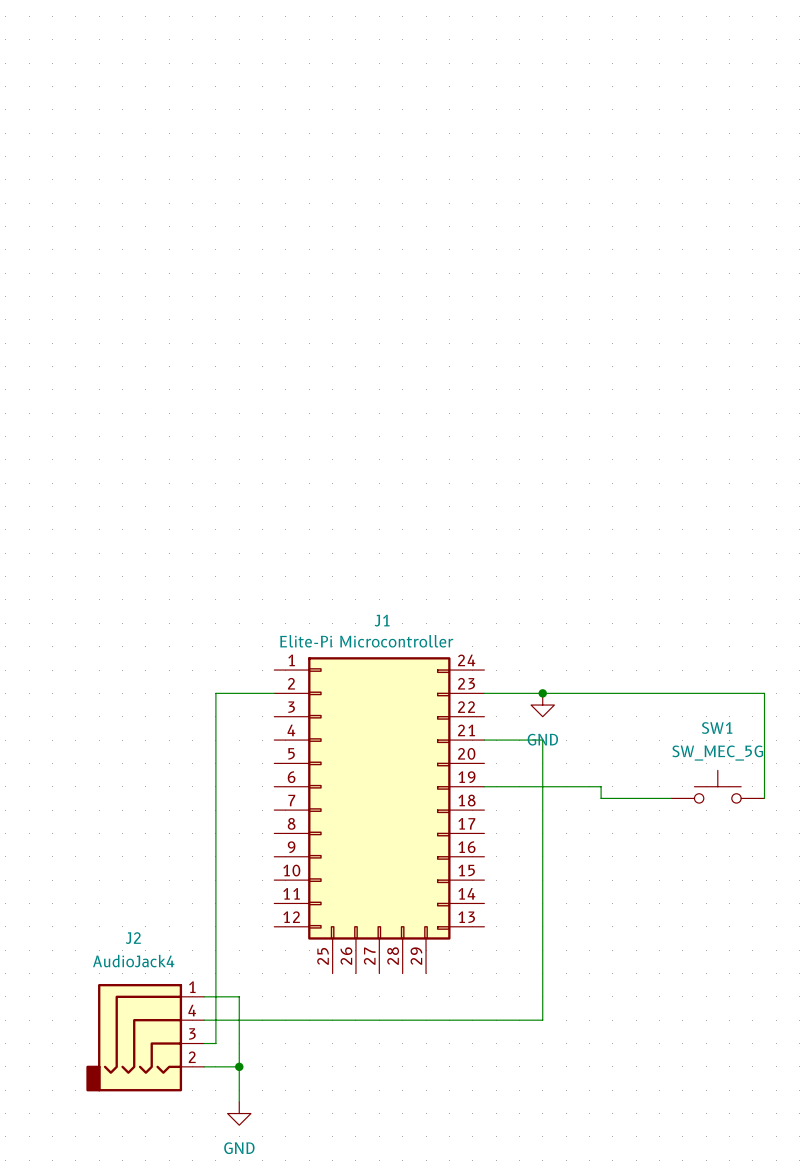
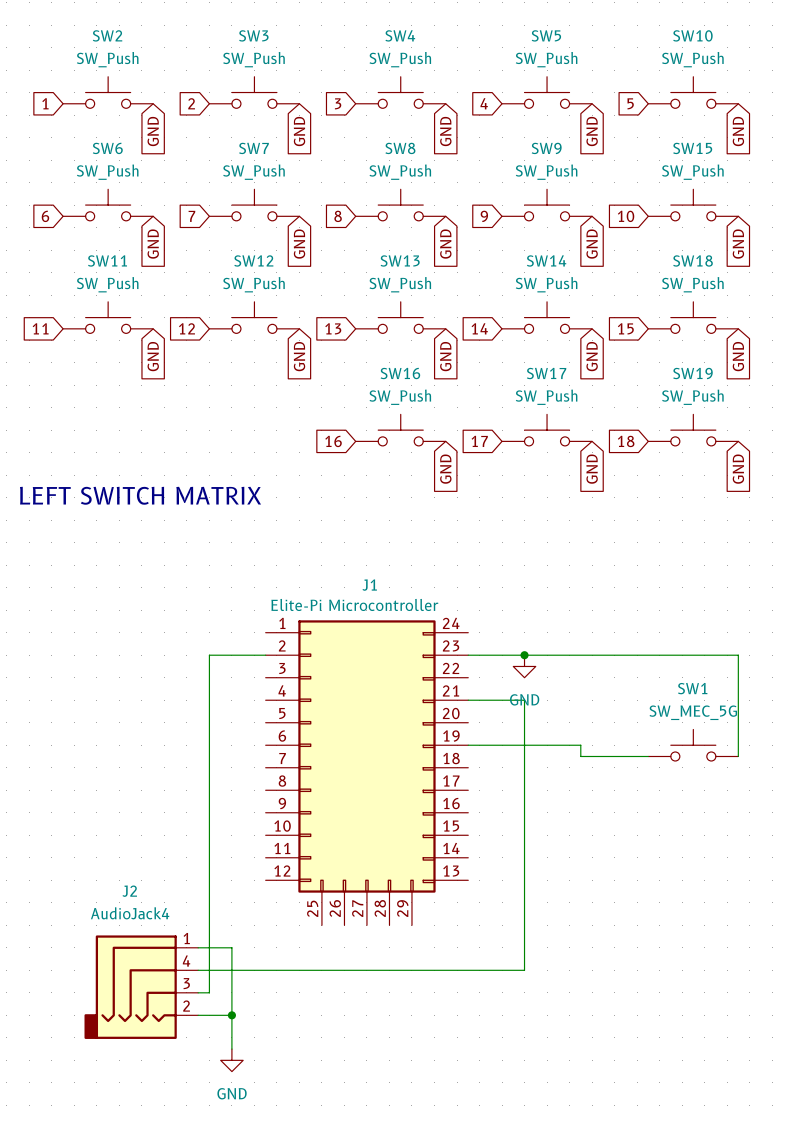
SW2: none -> SW_Push (108, 92)
SW3: none -> SW_Push (254, 92)
SW4: none -> SW_Push (400, 92)
SW5: none -> SW_Push (547, 92)
SW10: none -> SW_Push (693, 92)
global label: none -> 1 (45, 103)
global label: none -> 2 (191, 103)
global label: none -> 3 (338, 103)
global label: none -> 4 (484, 103)
global label: none -> 5 (630, 103)
global label: none -> GND (153, 131)
global label: none -> GND (299, 131)
global label: none -> GND (445, 131)
global label: none -> GND (592, 131)
global label: none -> GND (738, 131)
SW6: none -> SW_Push (108, 205)
SW7: none -> SW_Push (254, 205)
SW8: none -> SW_Push (400, 205)
SW9: none -> SW_Push (547, 205)
SW15: none -> SW_Push (693, 205)
global label: none -> 6 (45, 216)
global label: none -> 7 (191, 216)
global label: none -> 8 (338, 216)
global label: none -> 9 (484, 216)
global label: none -> 10 (626, 216)
global label: none -> GND (153, 244)
global label: none -> GND (299, 244)
global label: none -> GND (445, 244)
global label: none -> GND (592, 244)
global label: none -> GND (738, 244)
SW11: none -> SW_Push (108, 317)
SW12: none -> SW_Push (254, 317)
SW13: none -> SW_Push (400, 317)
SW14: none -> SW_Push (547, 317)
SW18: none -> SW_Push (693, 317)
global label: none -> 11 (40, 328)
global label: none -> 12 (186, 328)
global label: none -> 13 (333, 328)
global label: none -> 14 (479, 328)
global label: none -> 15 (625, 328)
global label: none -> GND (153, 356)
global label: none -> GND (299, 356)
global label: none -> GND (445, 356)
global label: none -> GND (592, 356)
global label: none -> GND (738, 356)
SW16: none -> SW_Push (400, 430)
SW17: none -> SW_Push (547, 430)
SW19: none -> SW_Push (693, 430)
global label: none -> 16 (333, 441)
global label: none -> 17 (479, 441)
global label: none -> 18 (626, 441)
global label: none -> GND (445, 469)
global label: none -> GND (592, 469)
global label: none -> GND (738, 469)
text: none -> LEFT SWITCH MATRIX (140, 495)

